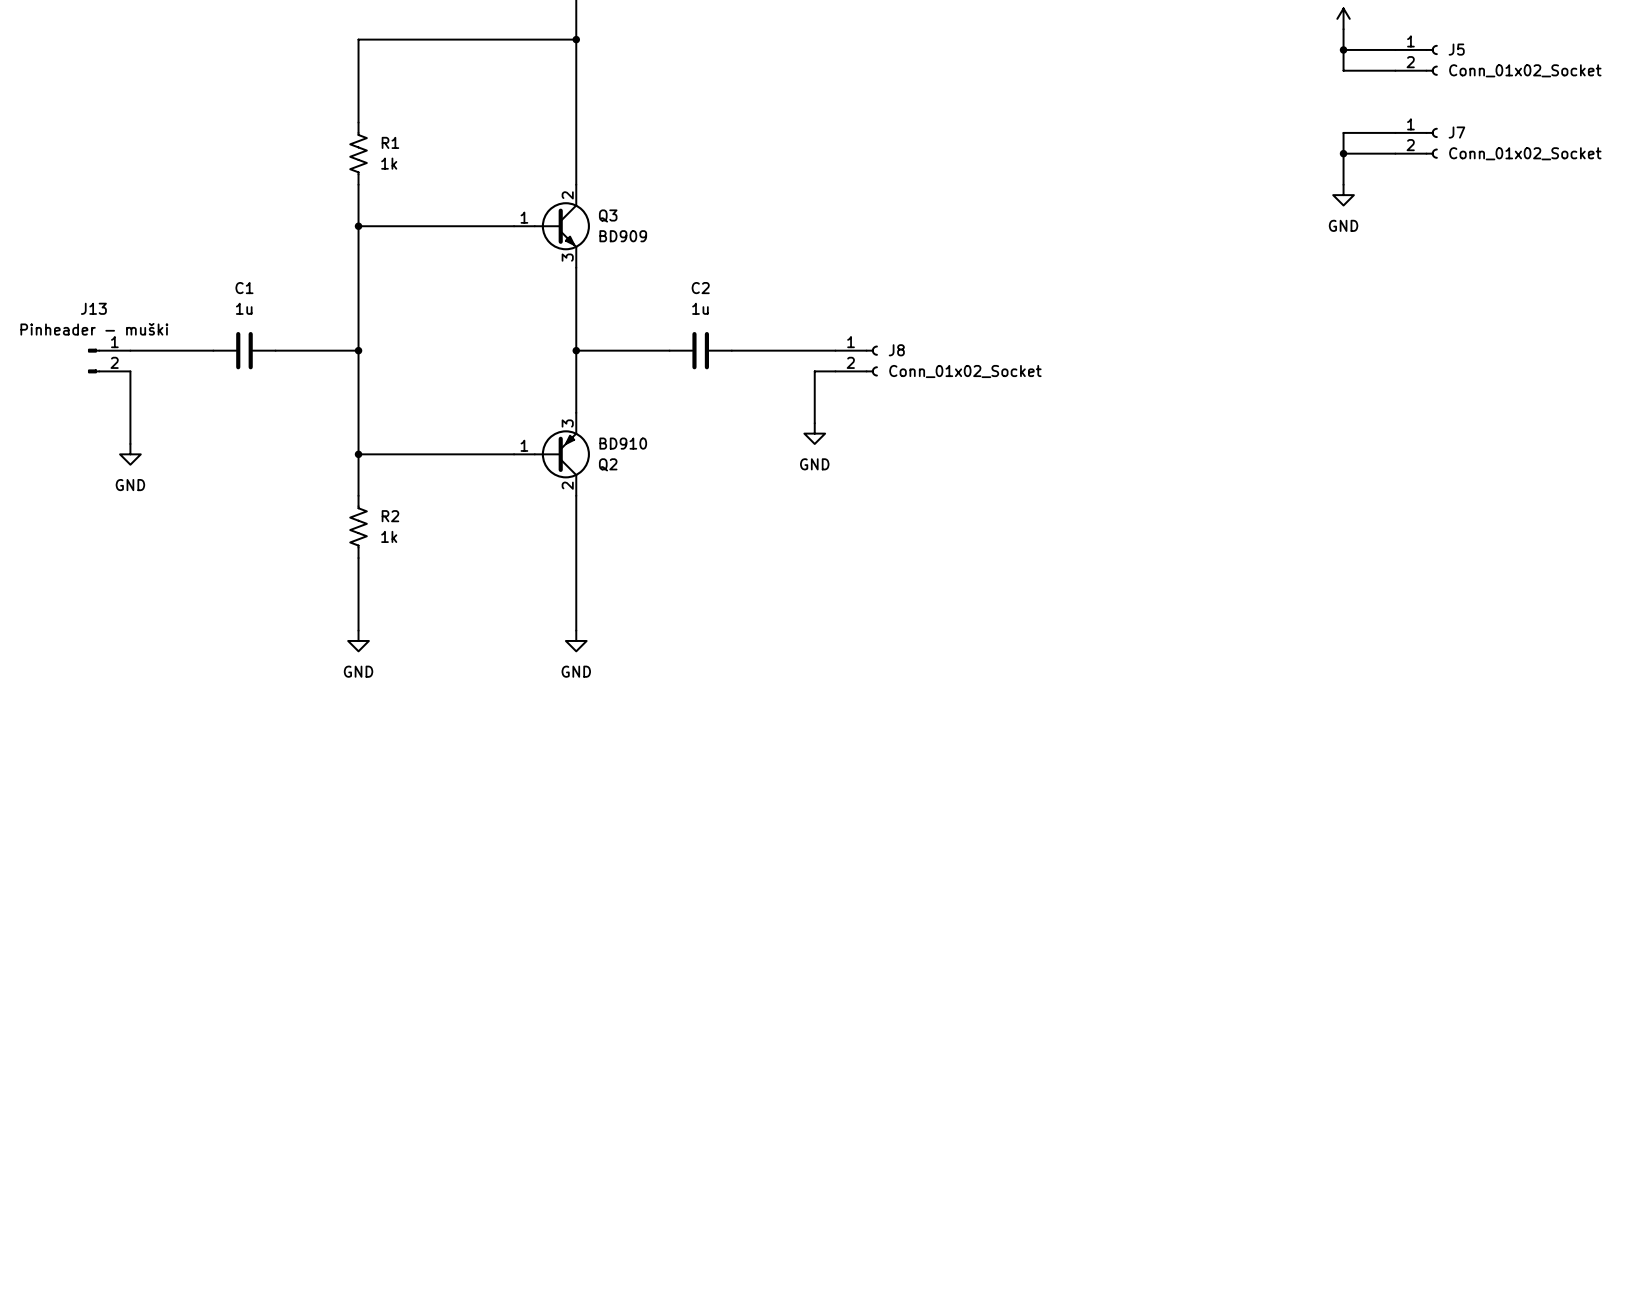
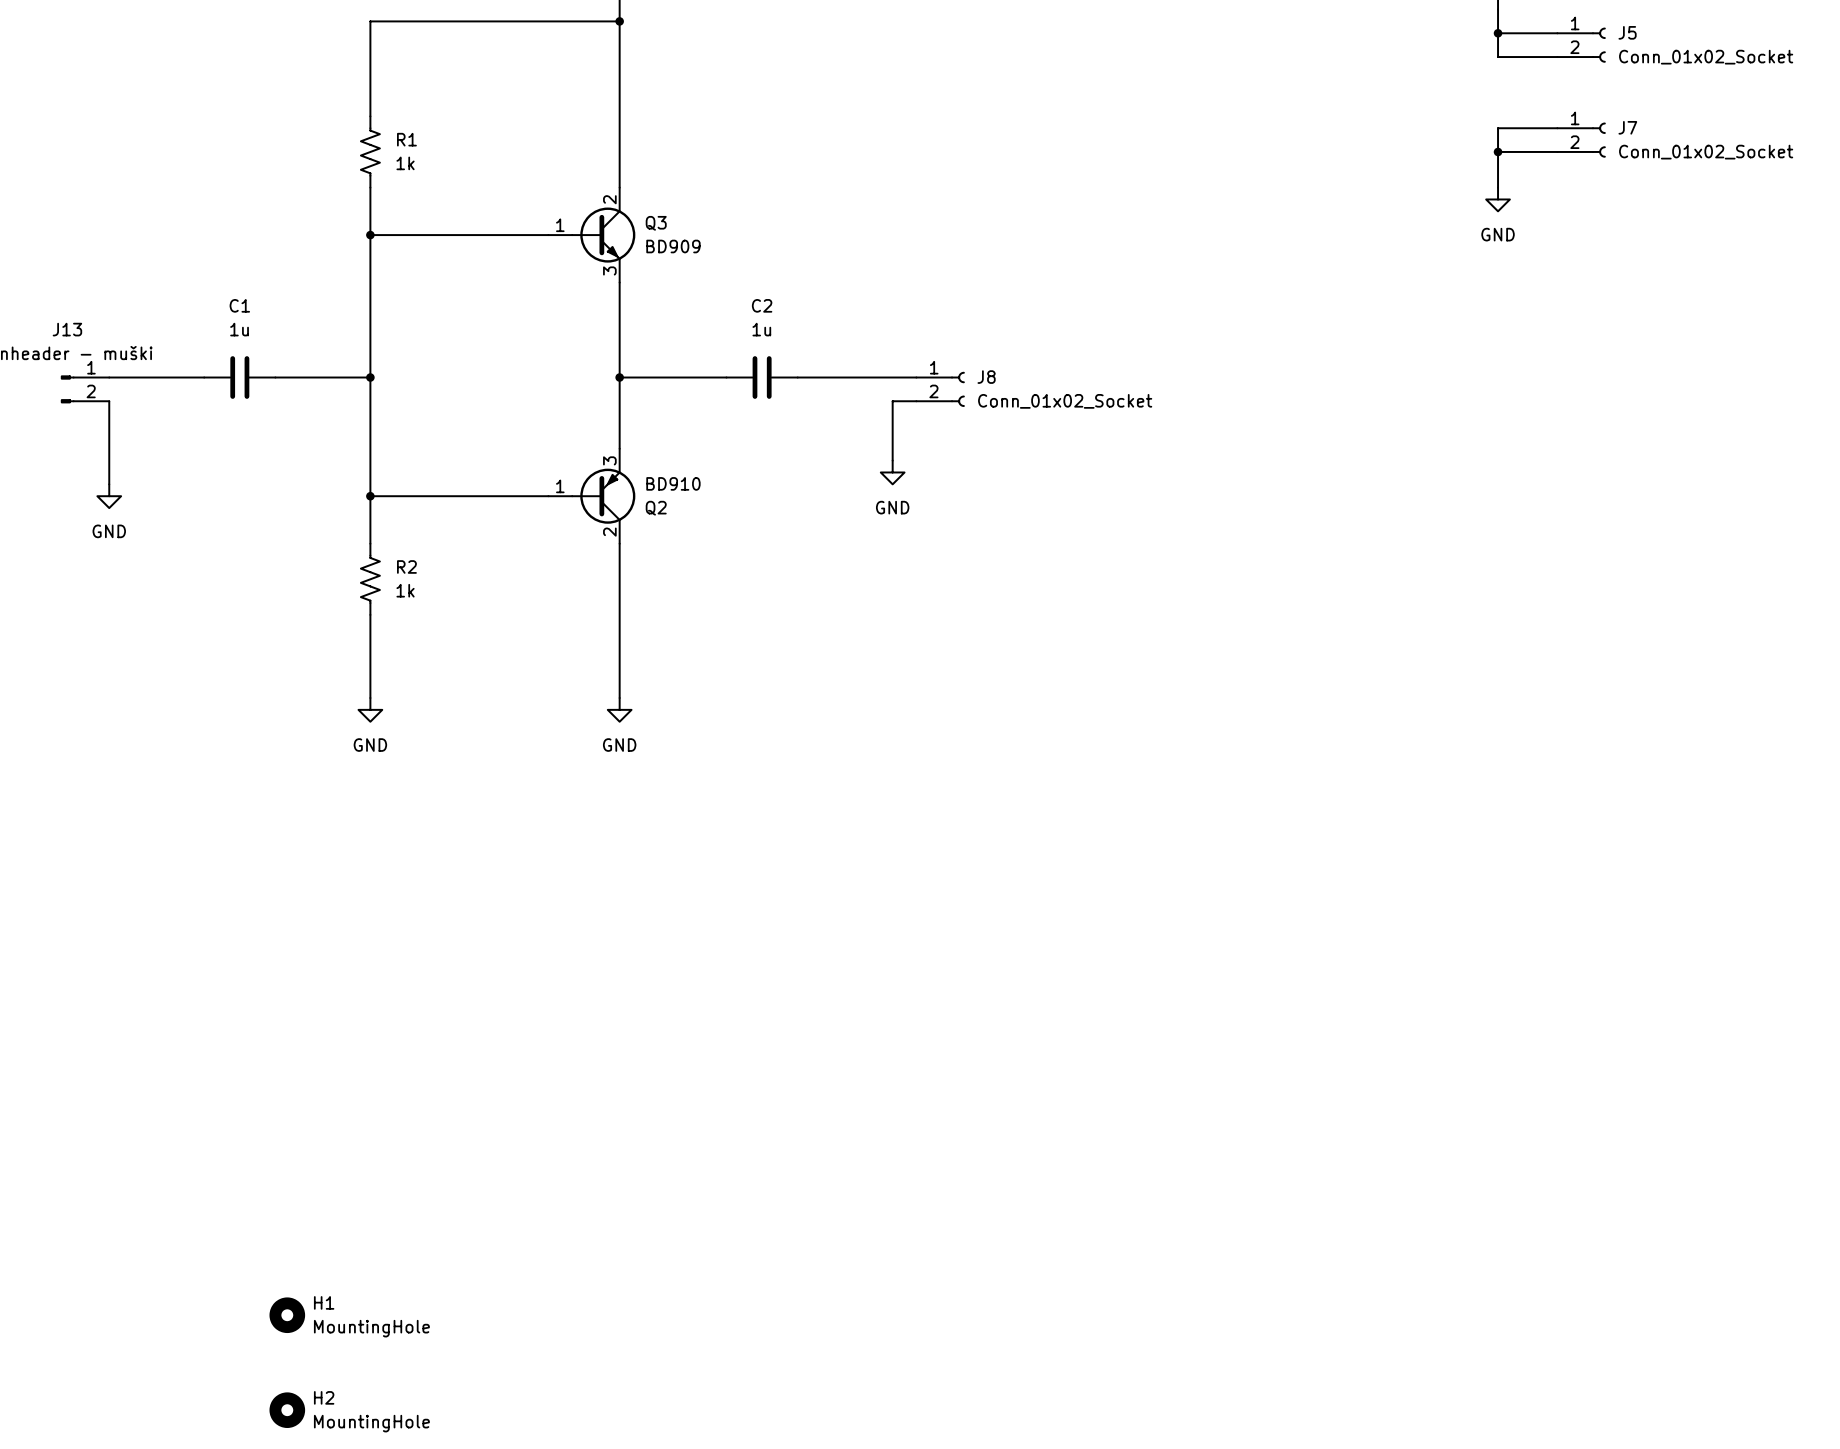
H1: none -> MountingHole (287, 1315)
H2: none -> MountingHole (287, 1410)

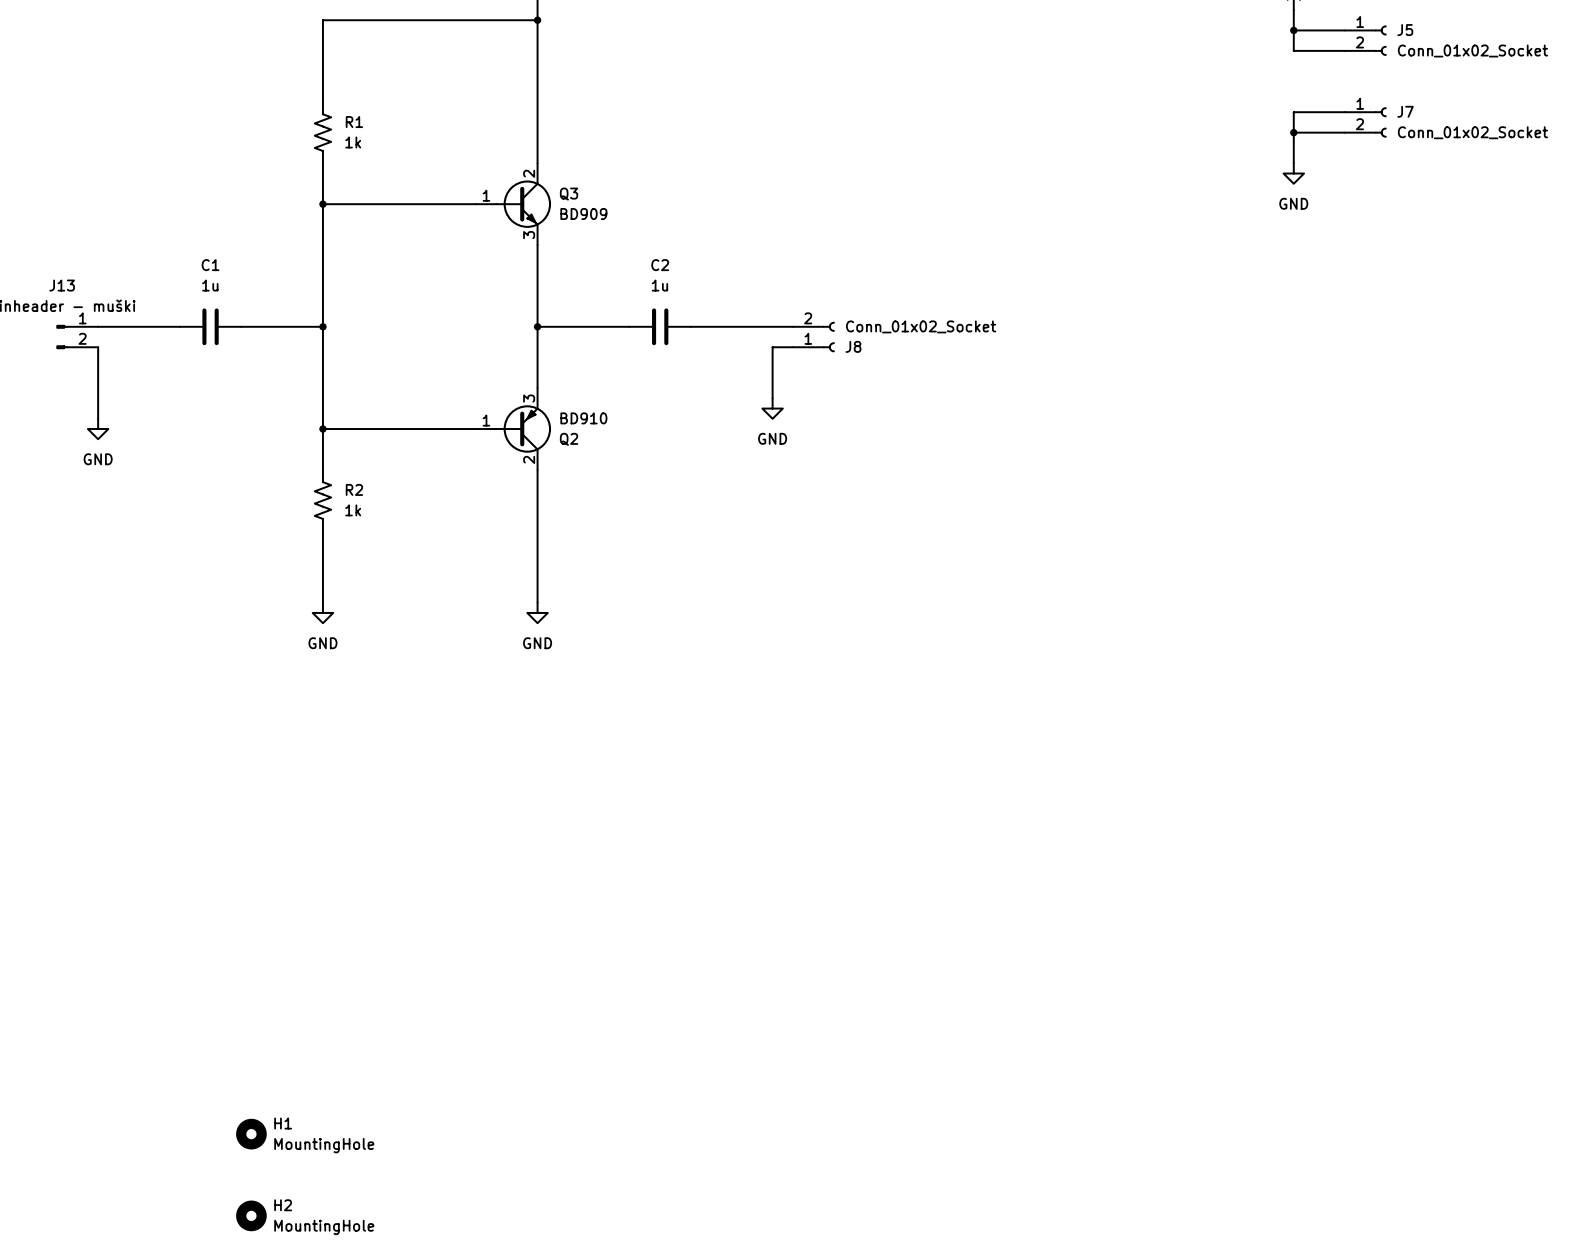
J8 flip: as is (957, 389) -> up-down (828, 337)

